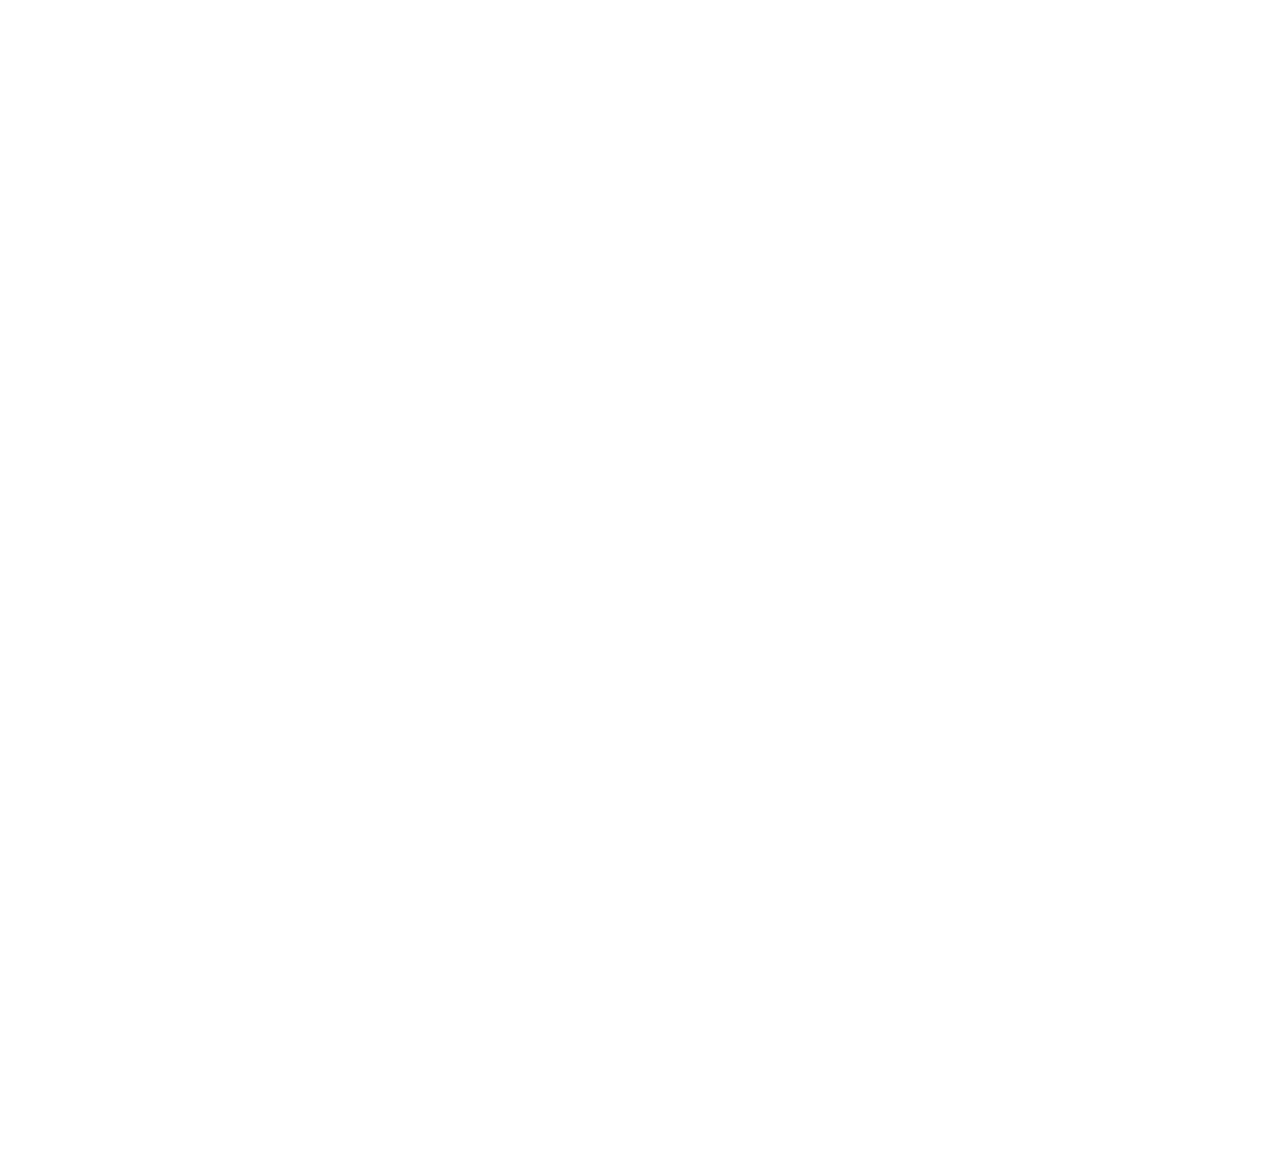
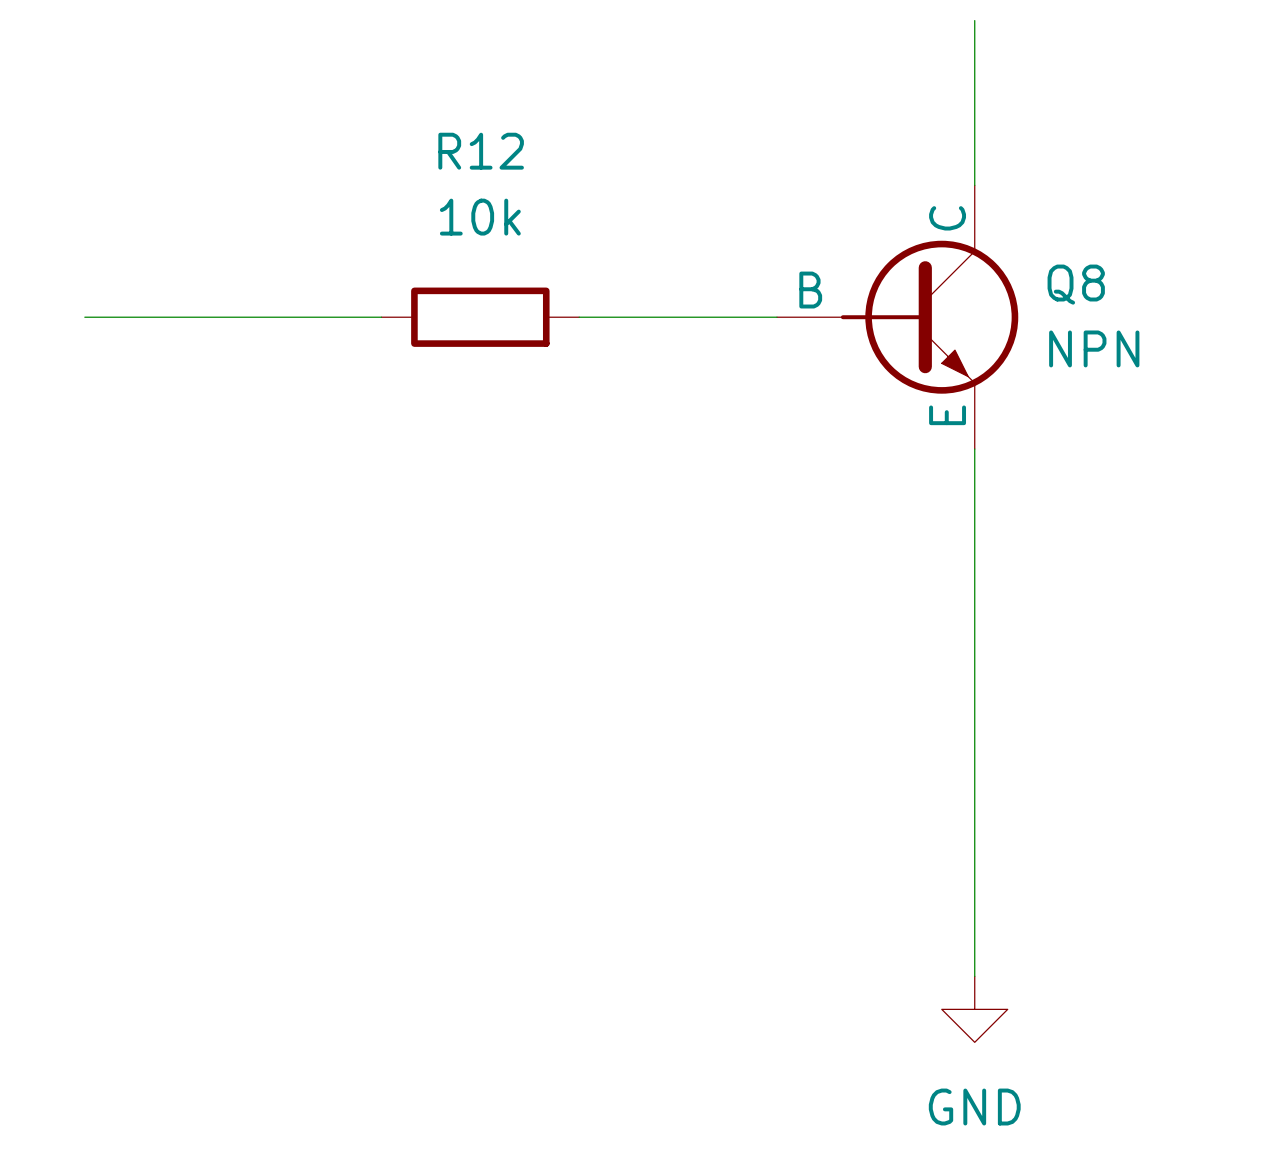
wire: none -> (974, 20) (974, 185)
wire: none -> (84, 317) (381, 317)
R12: none -> 10k (480, 317)
wire: none -> (579, 317) (776, 317)
Q8: none -> NPN (897, 317)
wire: none -> (974, 449) (974, 976)
power symbol: none -> GND (974, 1009)

